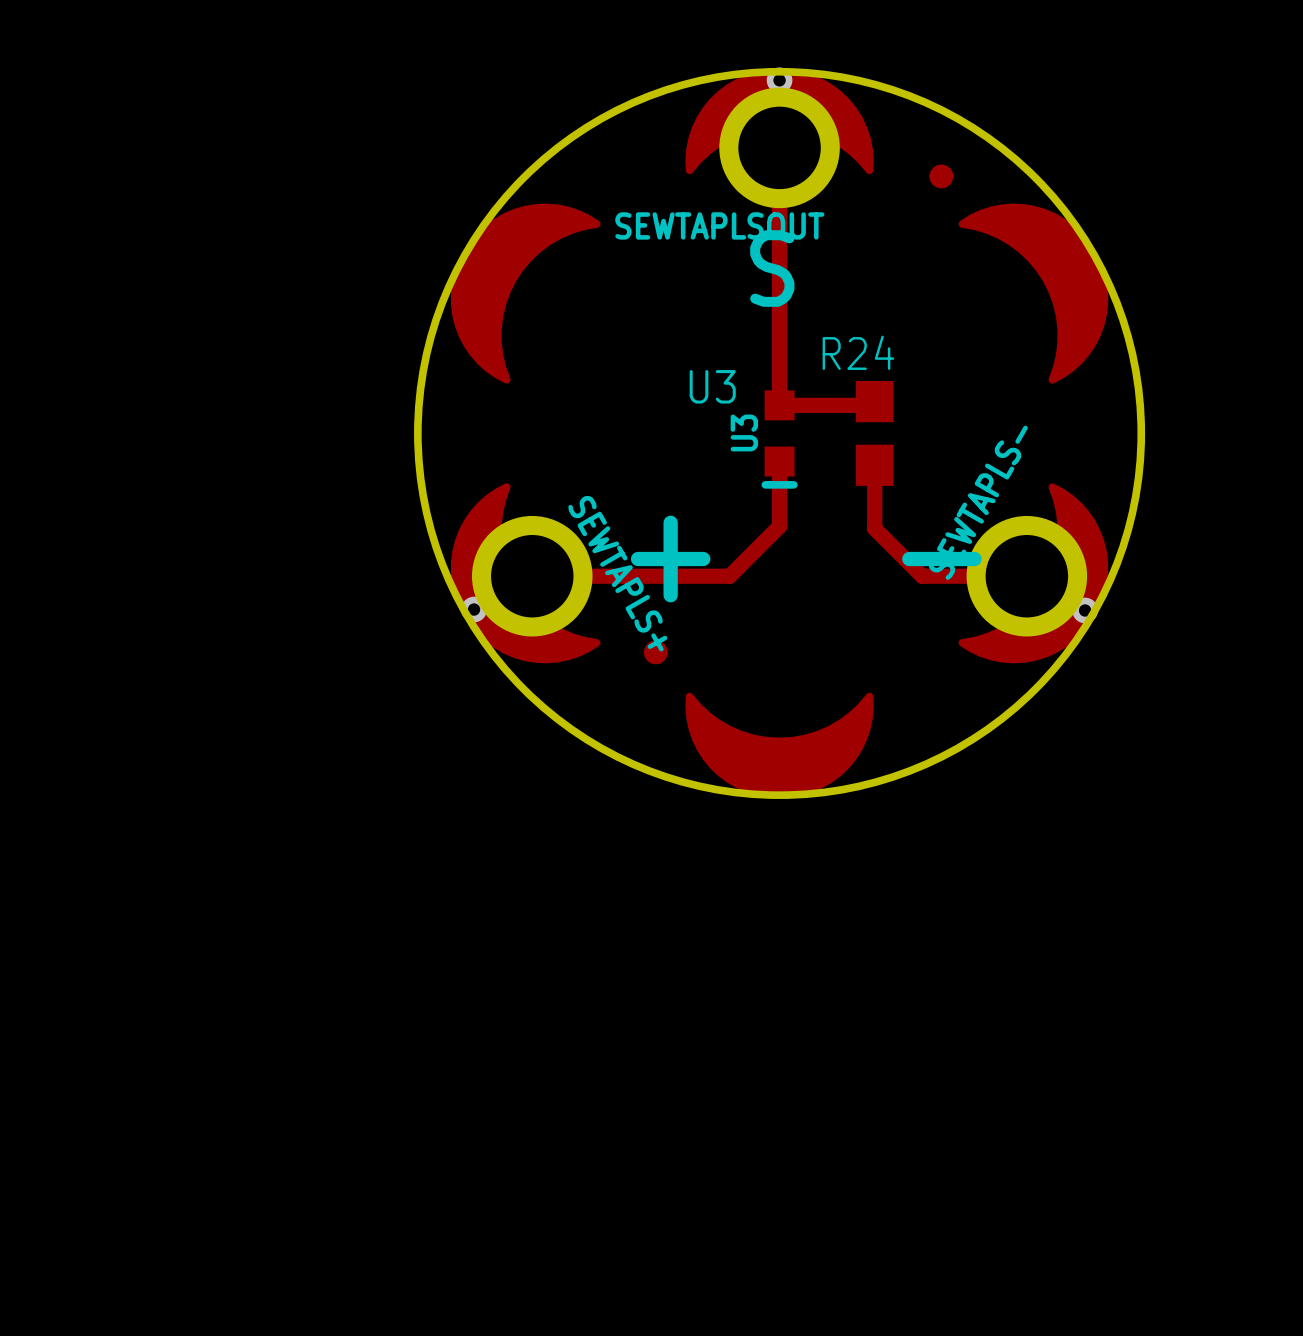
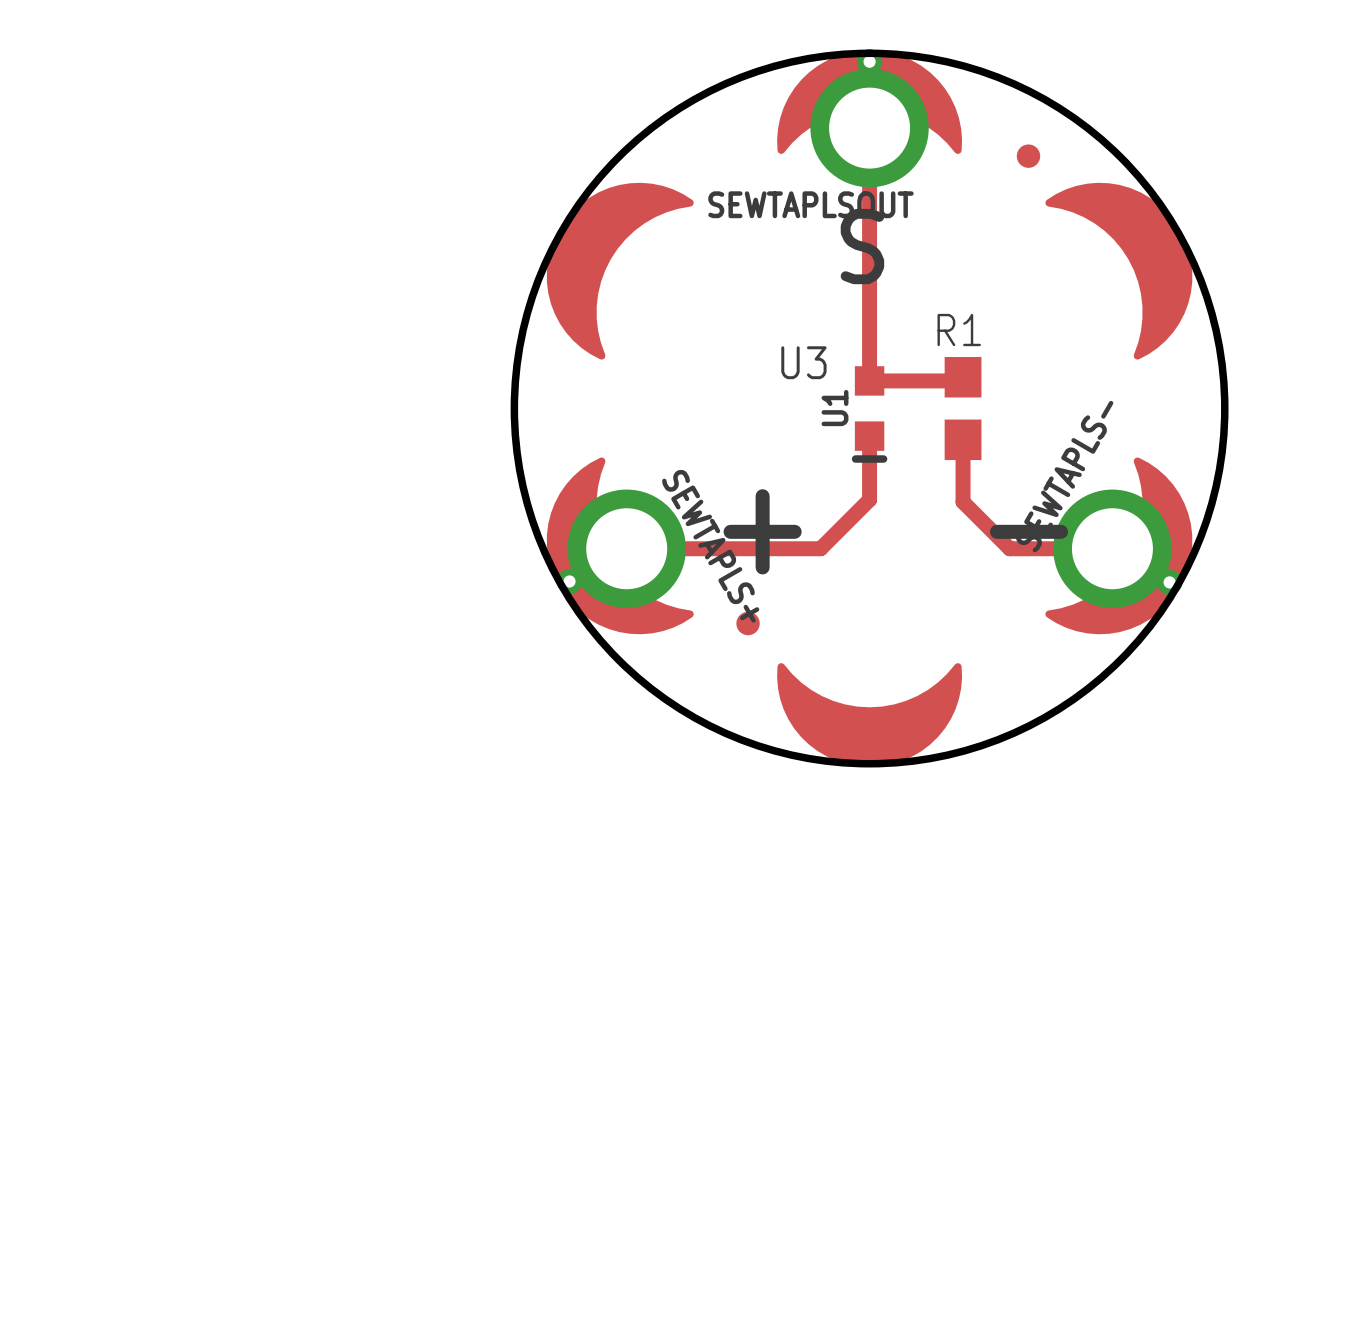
R24 name: R24 (858, 352) -> R1 (959, 330)
U3 name: U3 (744, 432) -> U1 (834, 408)

